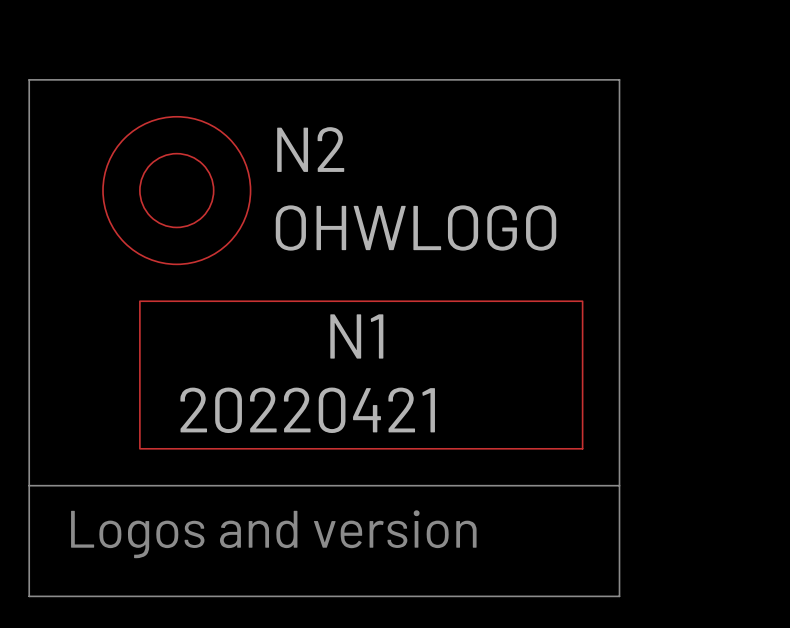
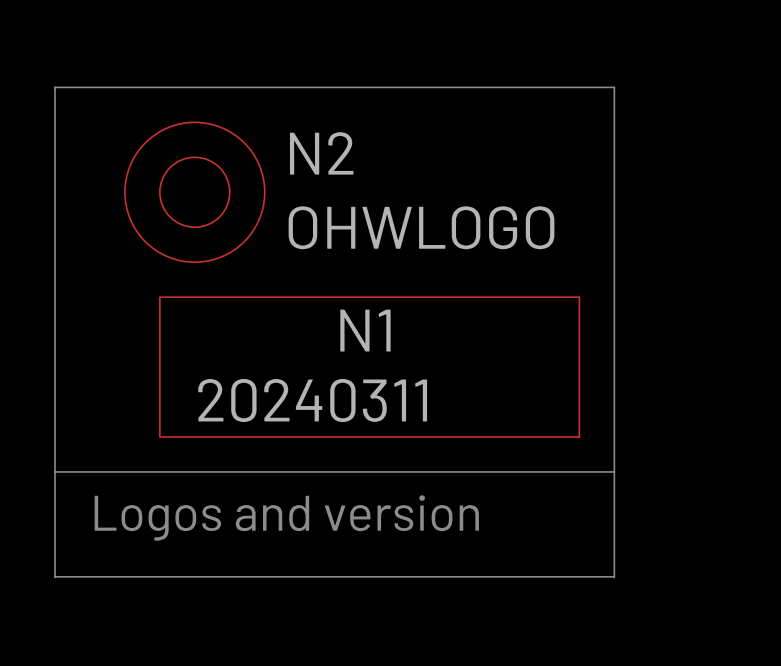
N1 value: 20220421 (307, 410) -> 20240311 (312, 400)

